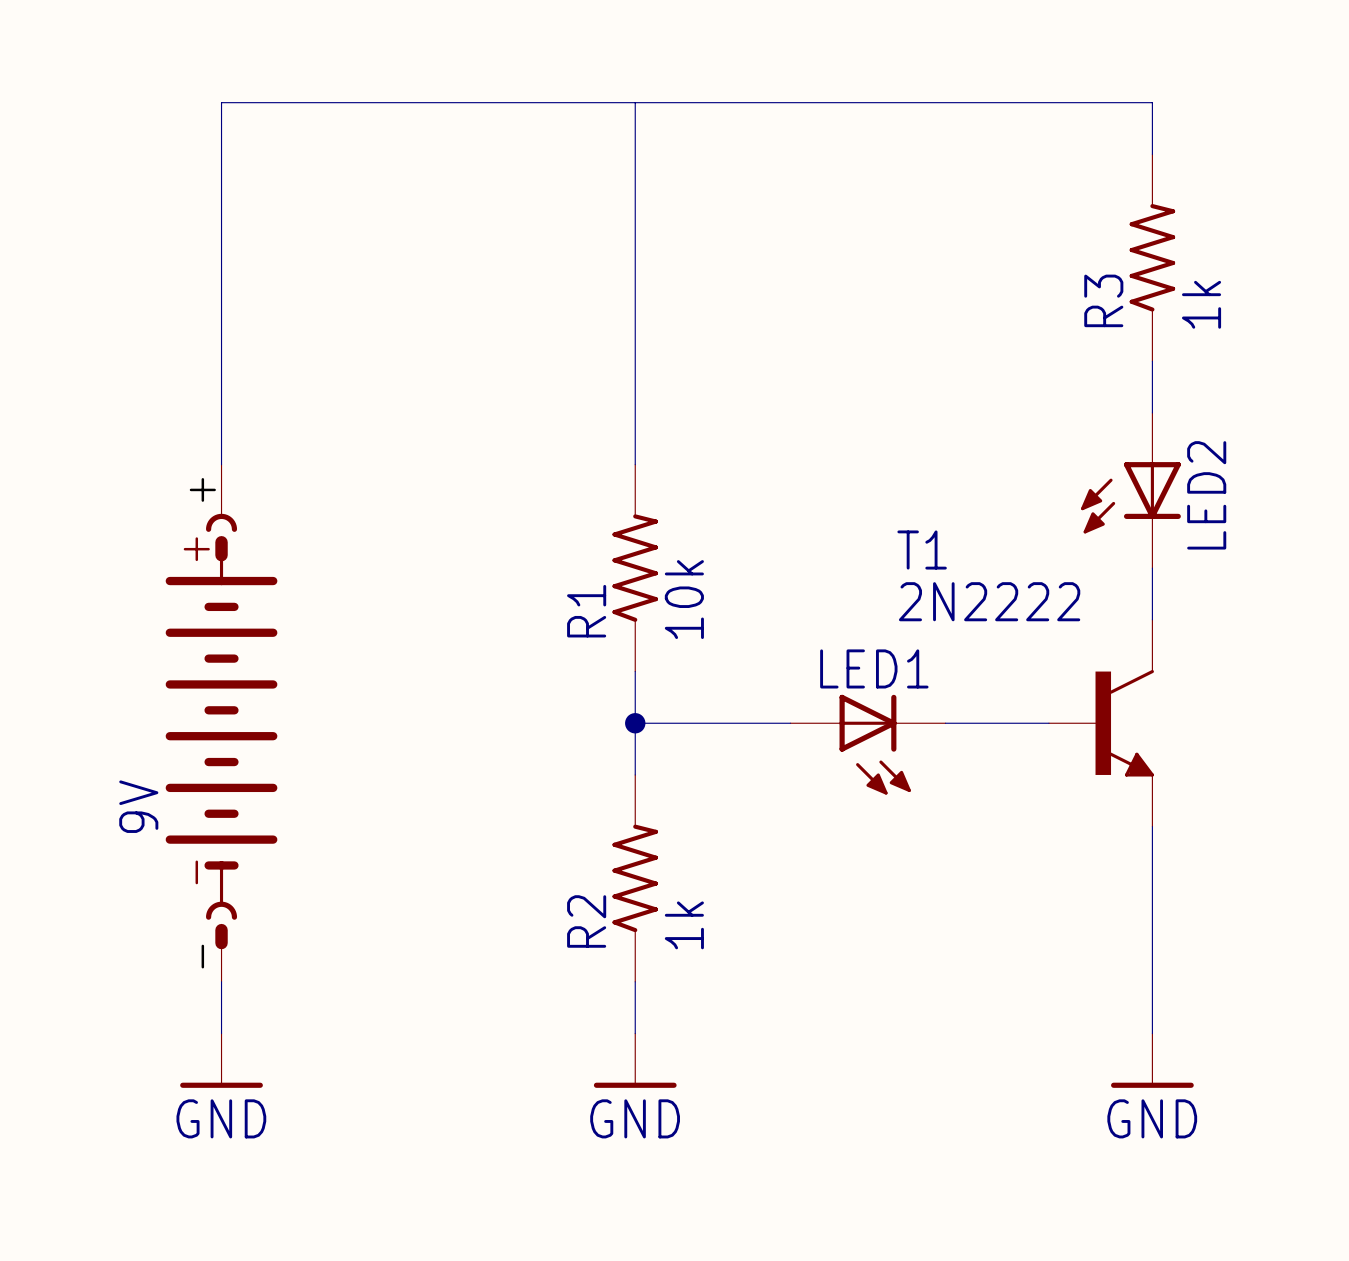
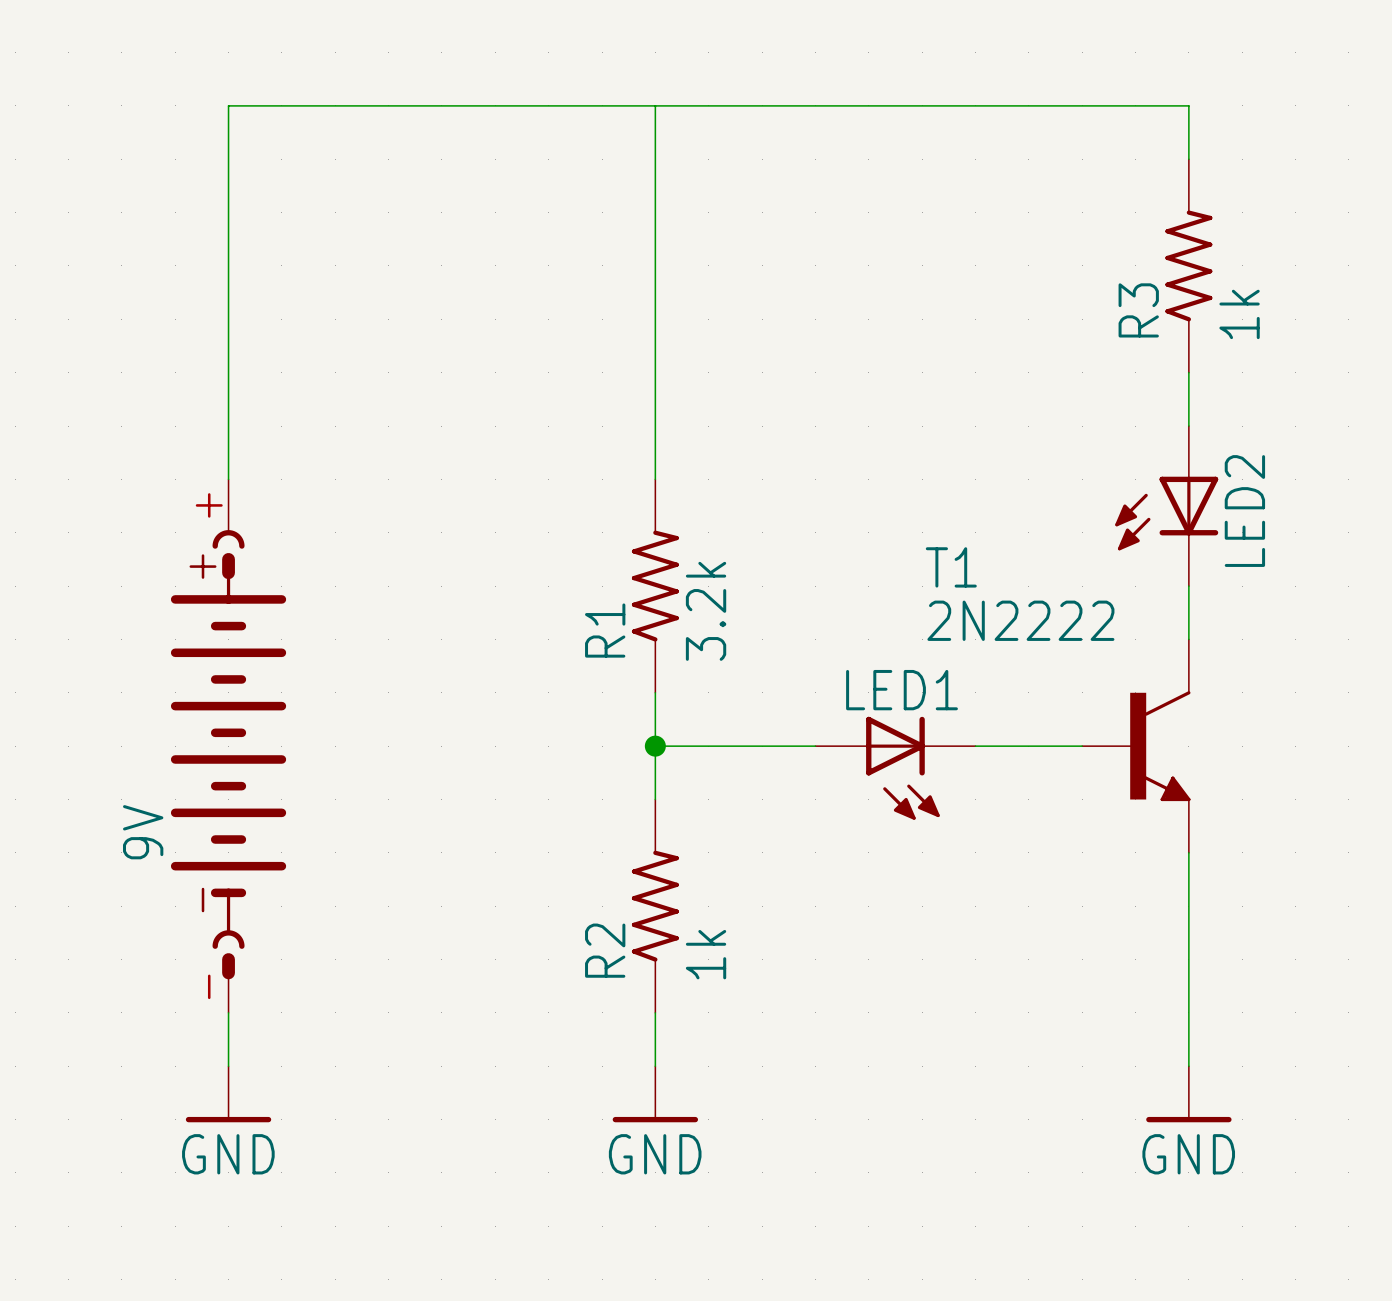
R1 value: 10k (684, 599) -> 3.2k (706, 611)

